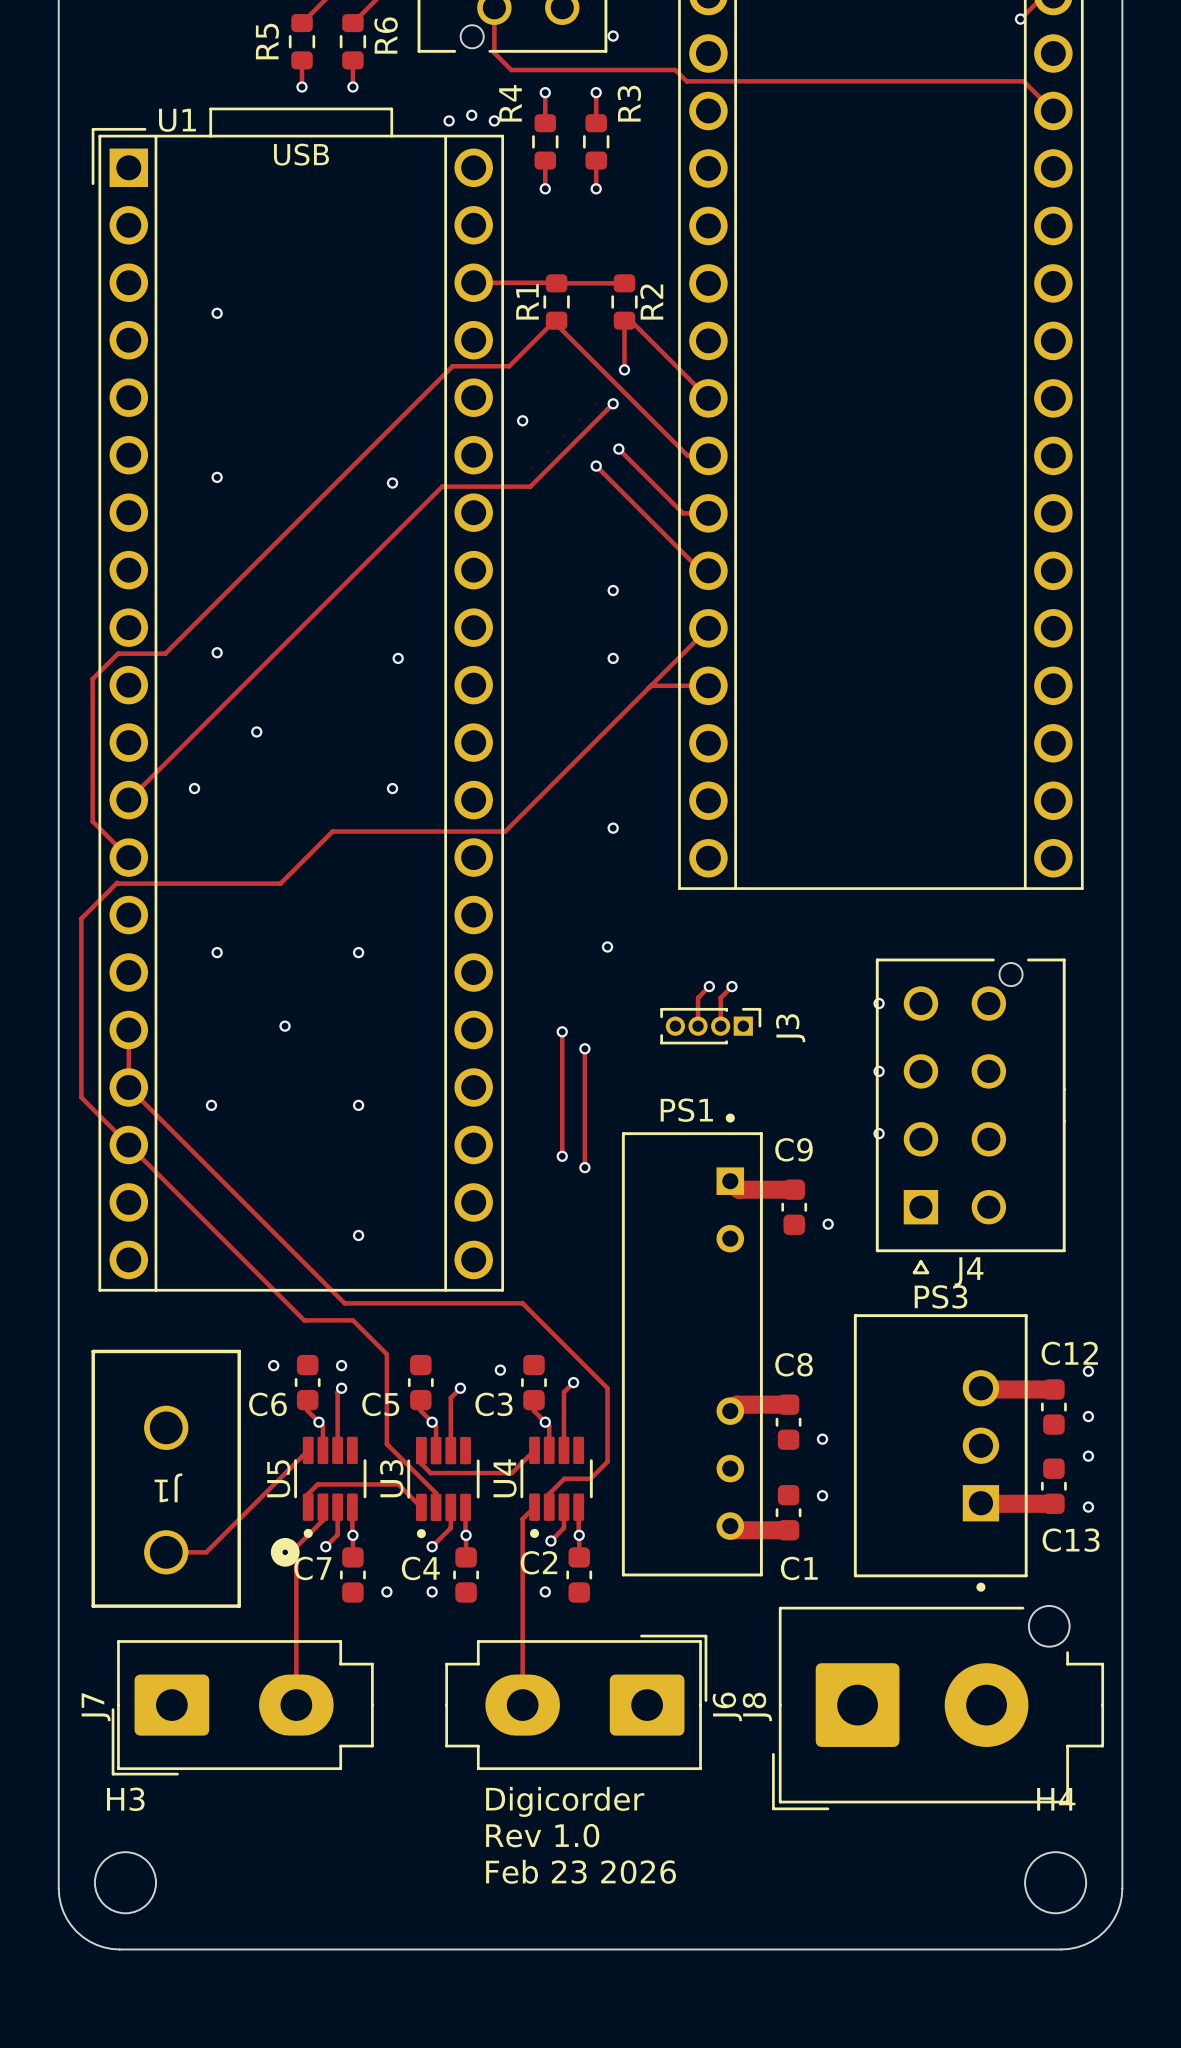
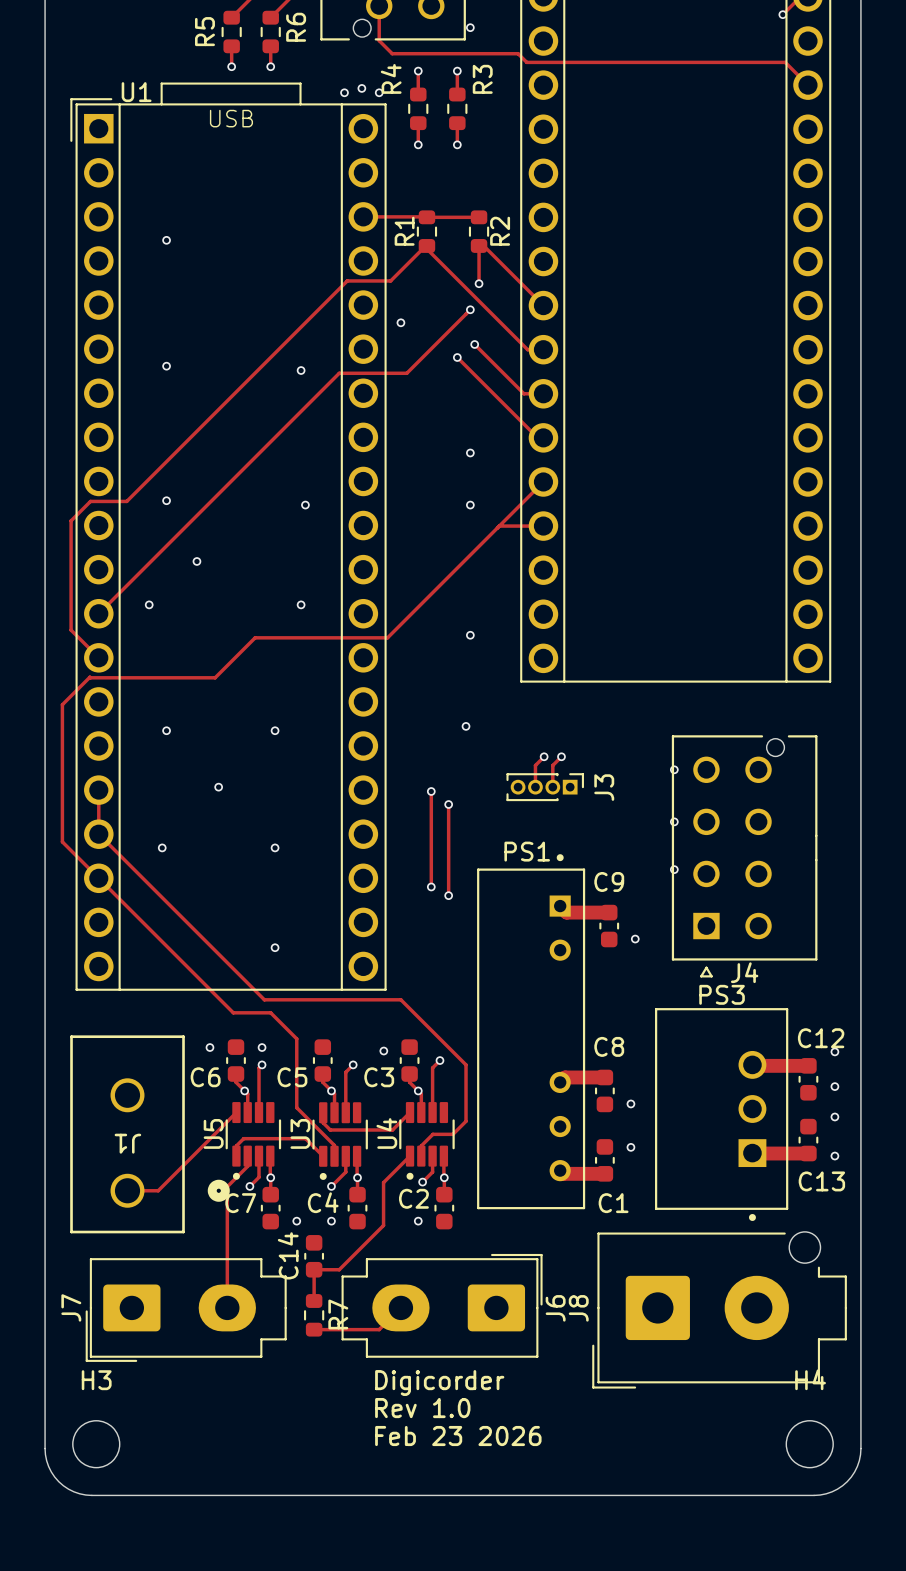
track: (522, 1519) (522, 1705) -> (400, 1165) (383, 1182) (383, 1225) (339, 1269) (314, 1269) (314, 1300)
C14: none -> (314, 1256)
track: none -> (396, 1312) (379, 1329) (314, 1329)
R7: none -> (314, 1315)

